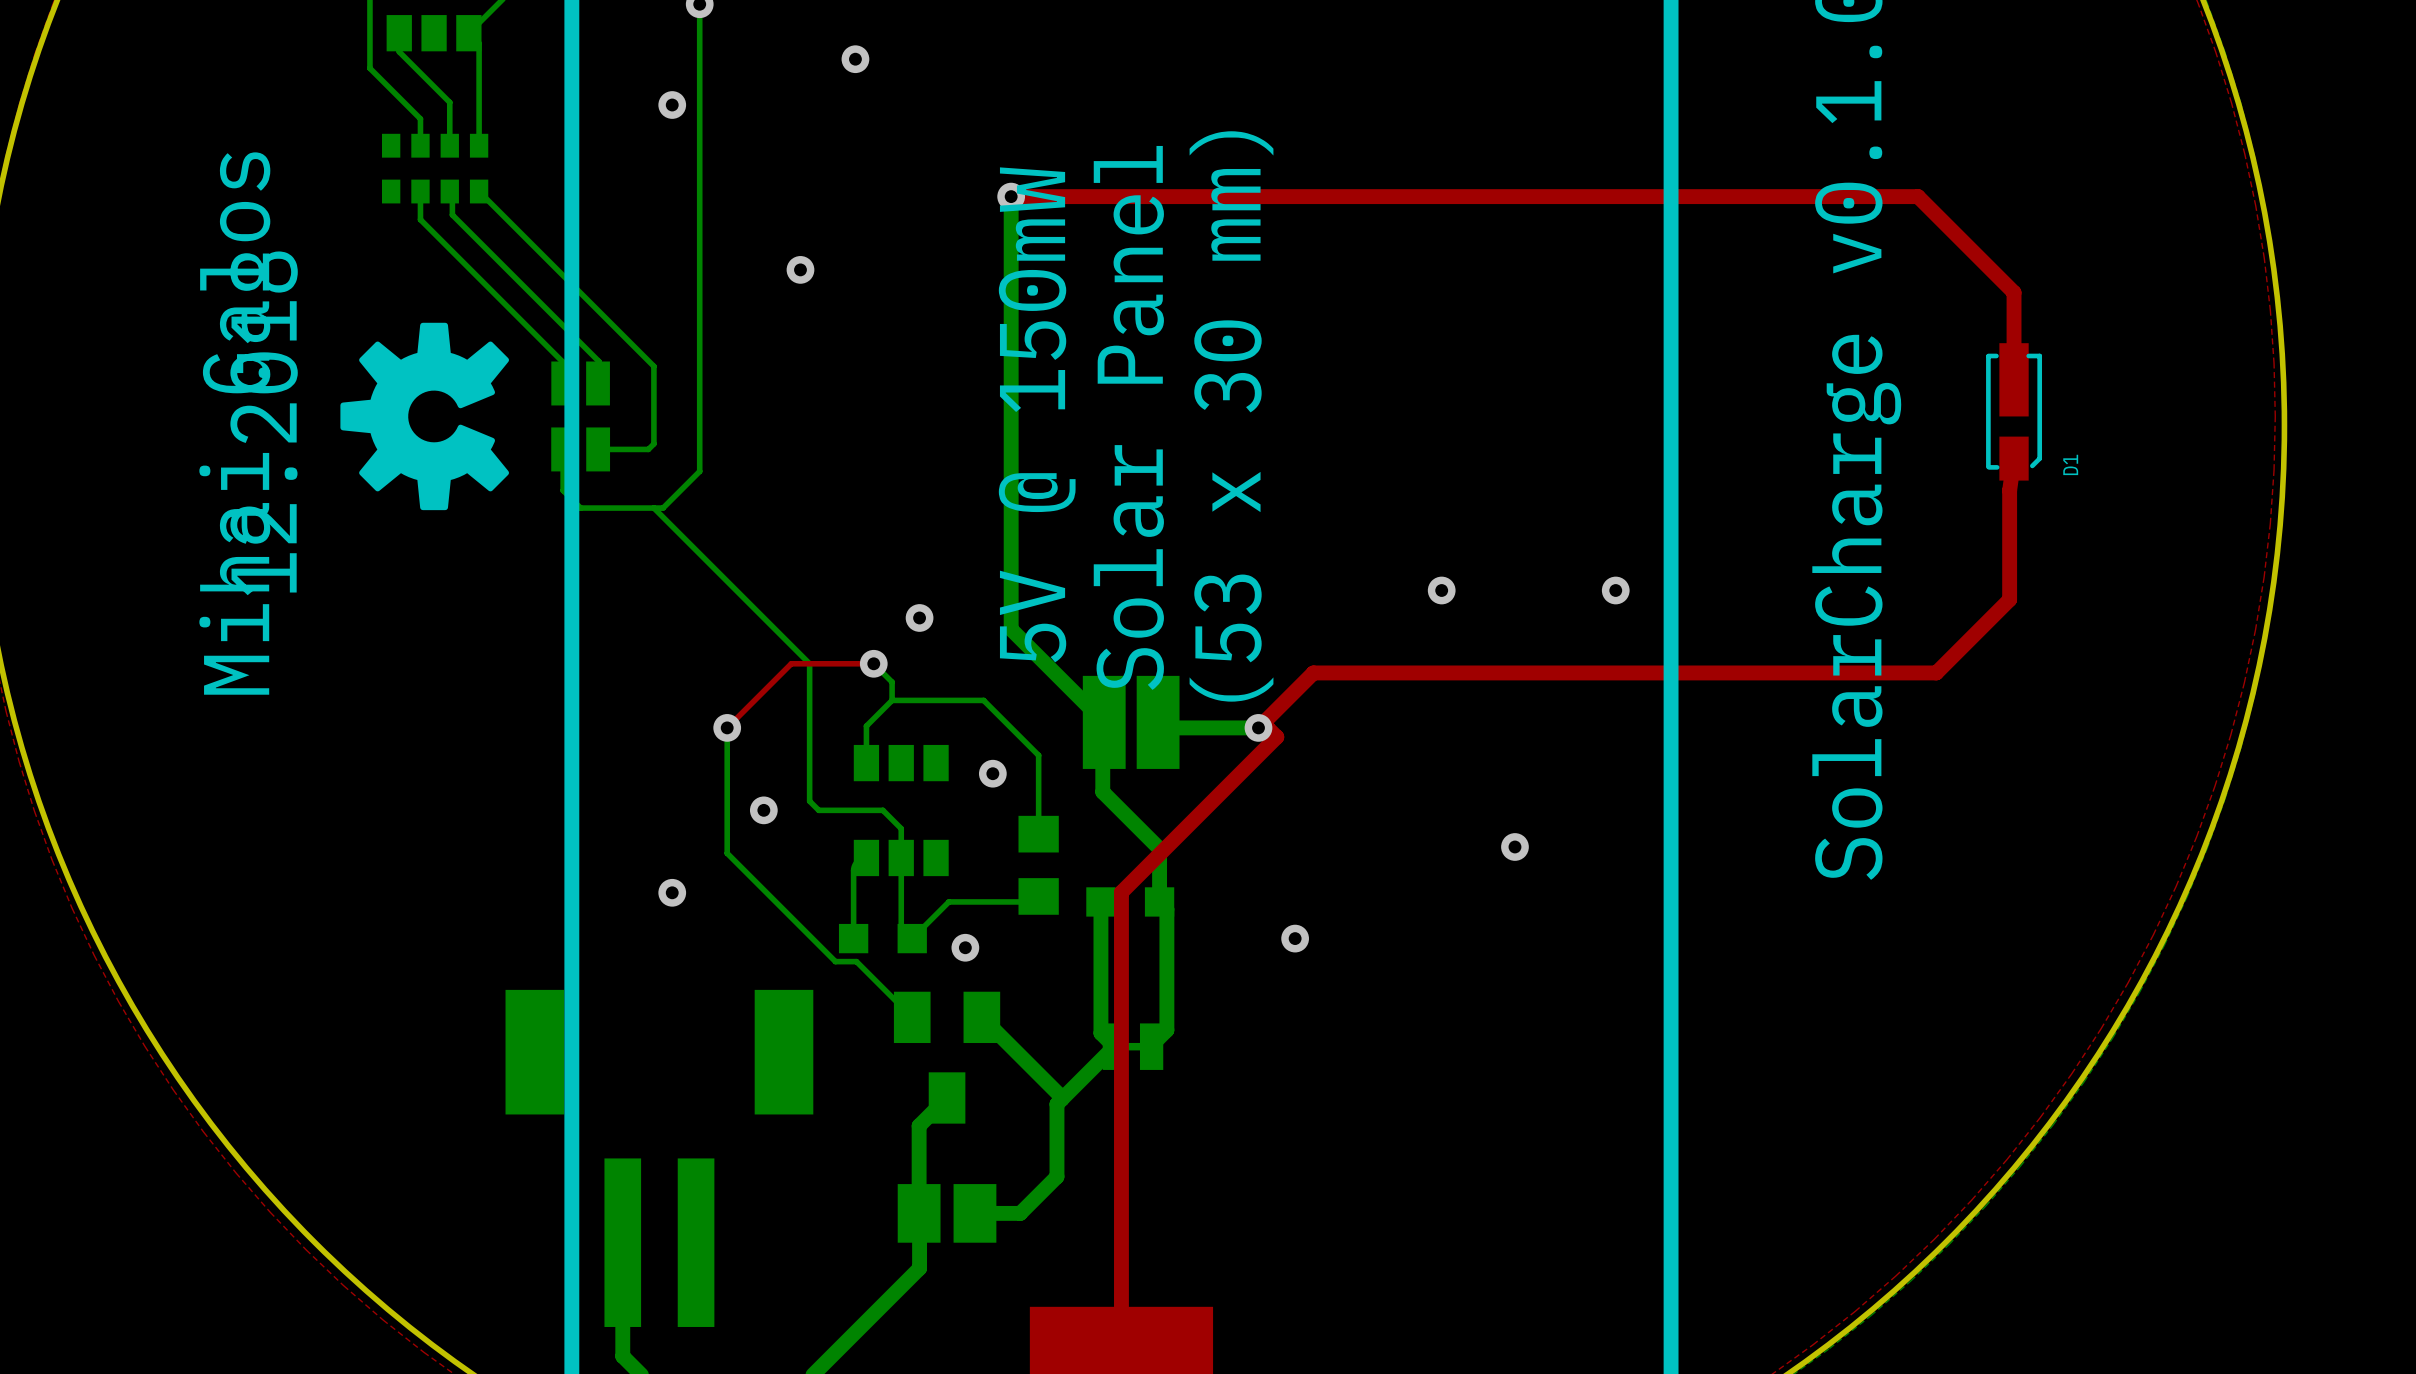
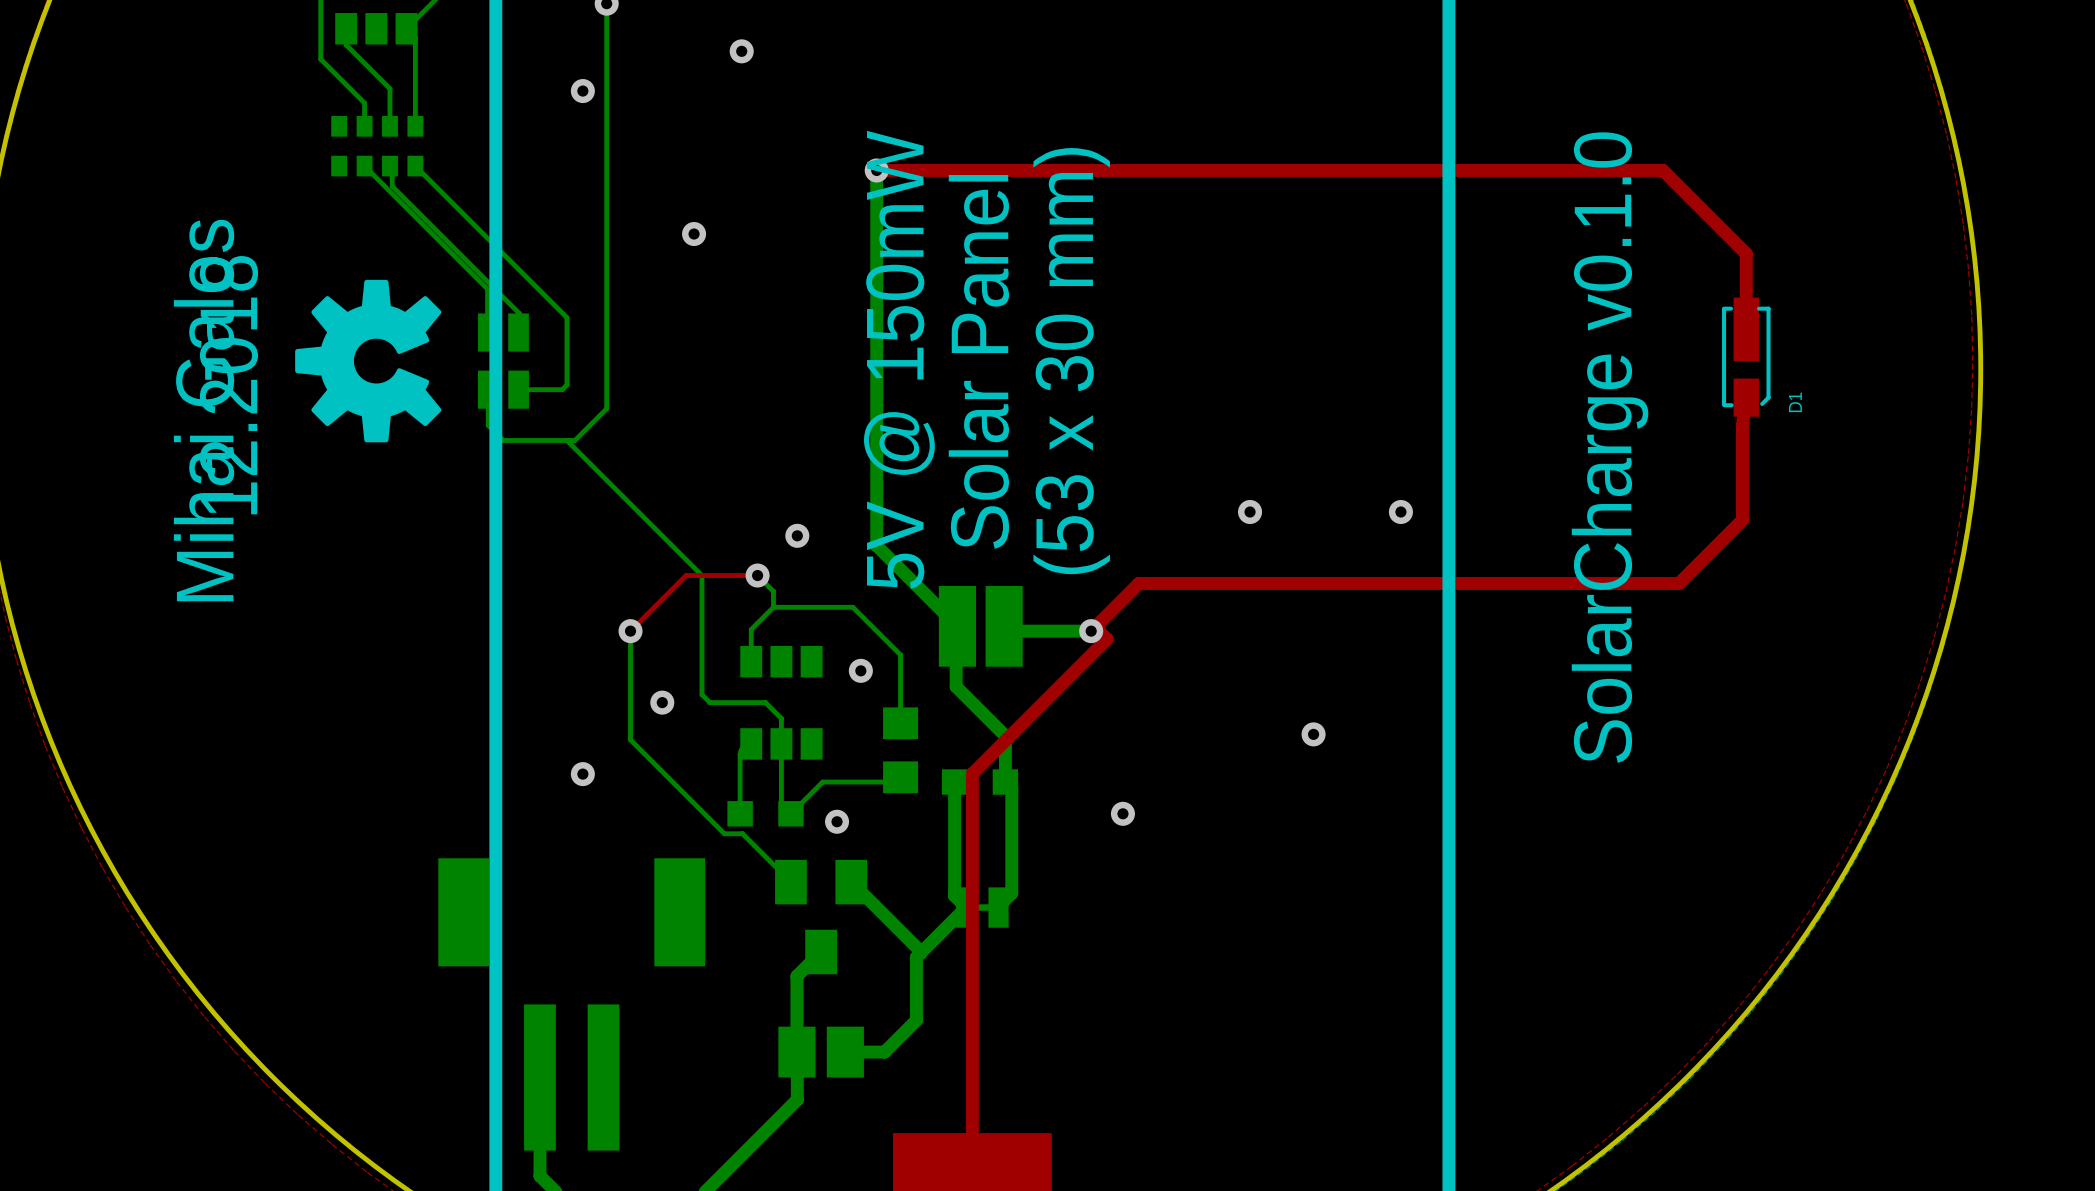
bottom track: (420, 191) (420, 219) (562, 361) -> (364, 166) (487, 289) (487, 313)

